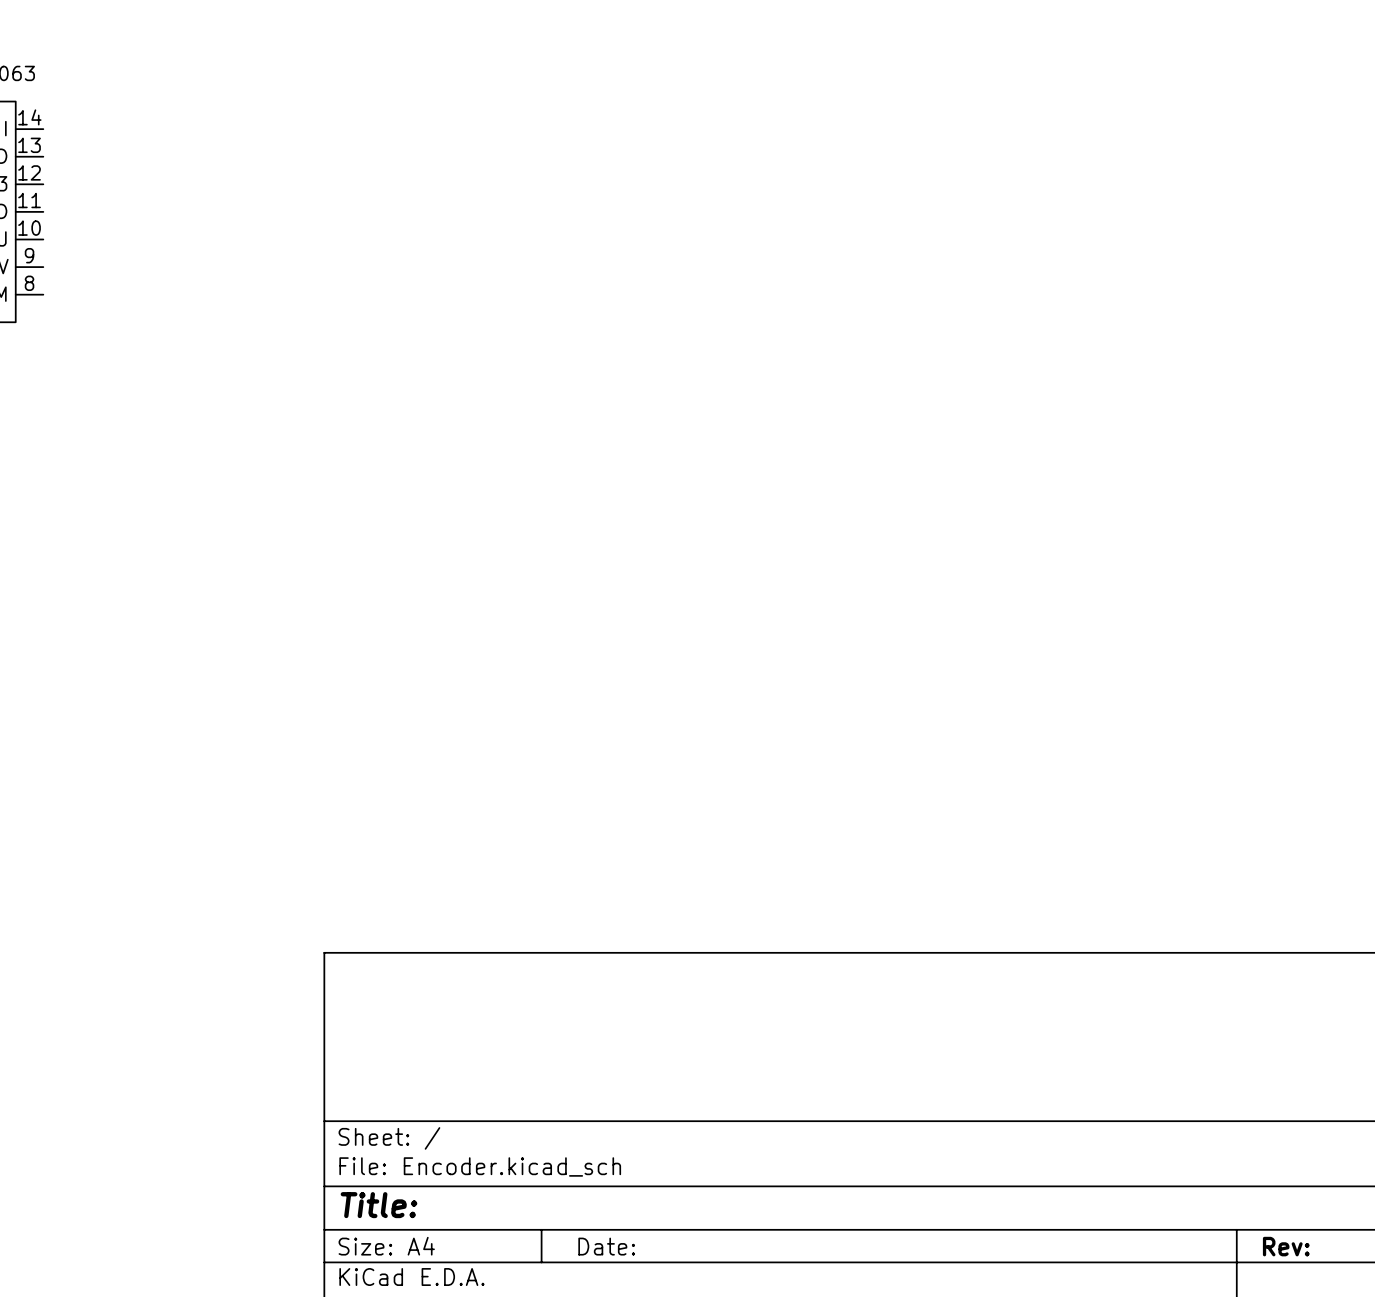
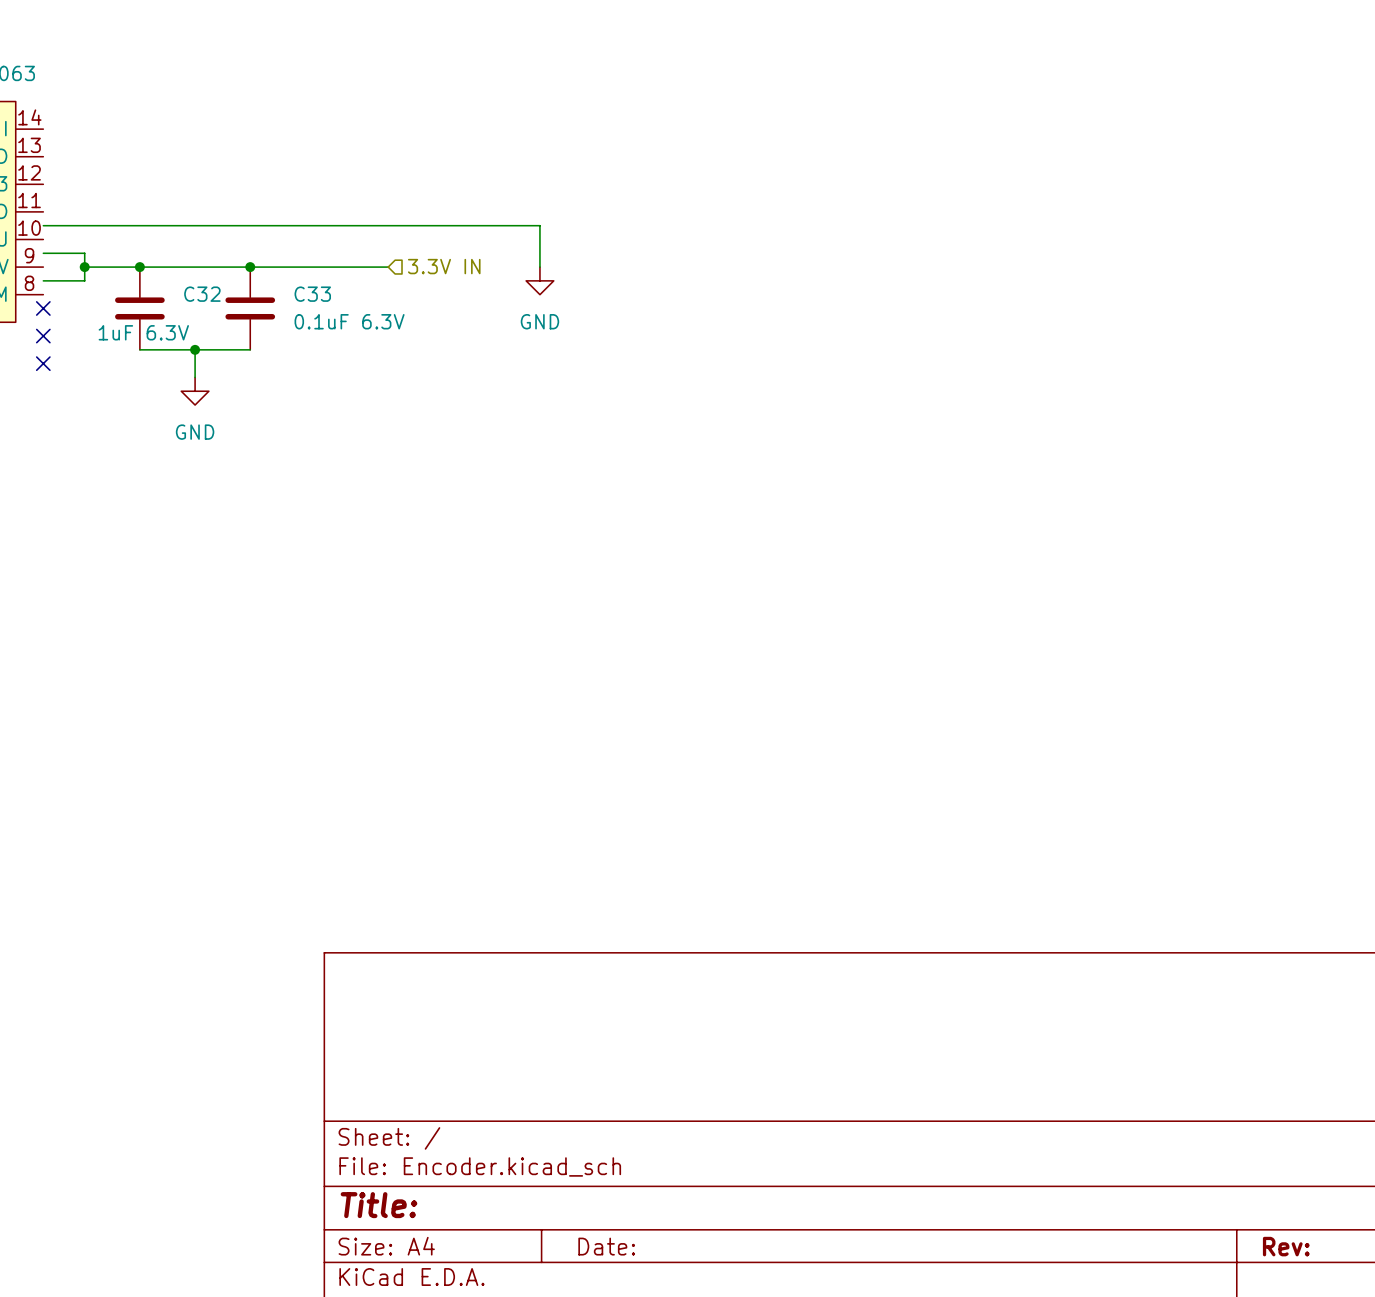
wire: none -> (43, 225) (539, 225) (539, 267)
wire: none -> (43, 253) (84, 253) (84, 280) (43, 280)
hierarchical label: none -> 3.3V IN (444, 266)
wire: none -> (84, 267) (388, 267)
junction: none -> (84, 267)
junction: none -> (139, 267)
junction: none -> (250, 267)
power symbol: none -> GND (539, 280)
no-connect mark: none -> (43, 308)
C32: none -> 1uF 6.3V (139, 308)
C33: none -> 0.1uF 6.3V (250, 308)
no-connect mark: none -> (43, 336)
wire: none -> (139, 349) (250, 349)
wire: none -> (195, 349) (195, 377)
junction: none -> (195, 349)
no-connect mark: none -> (43, 363)
power symbol: none -> GND (195, 391)

